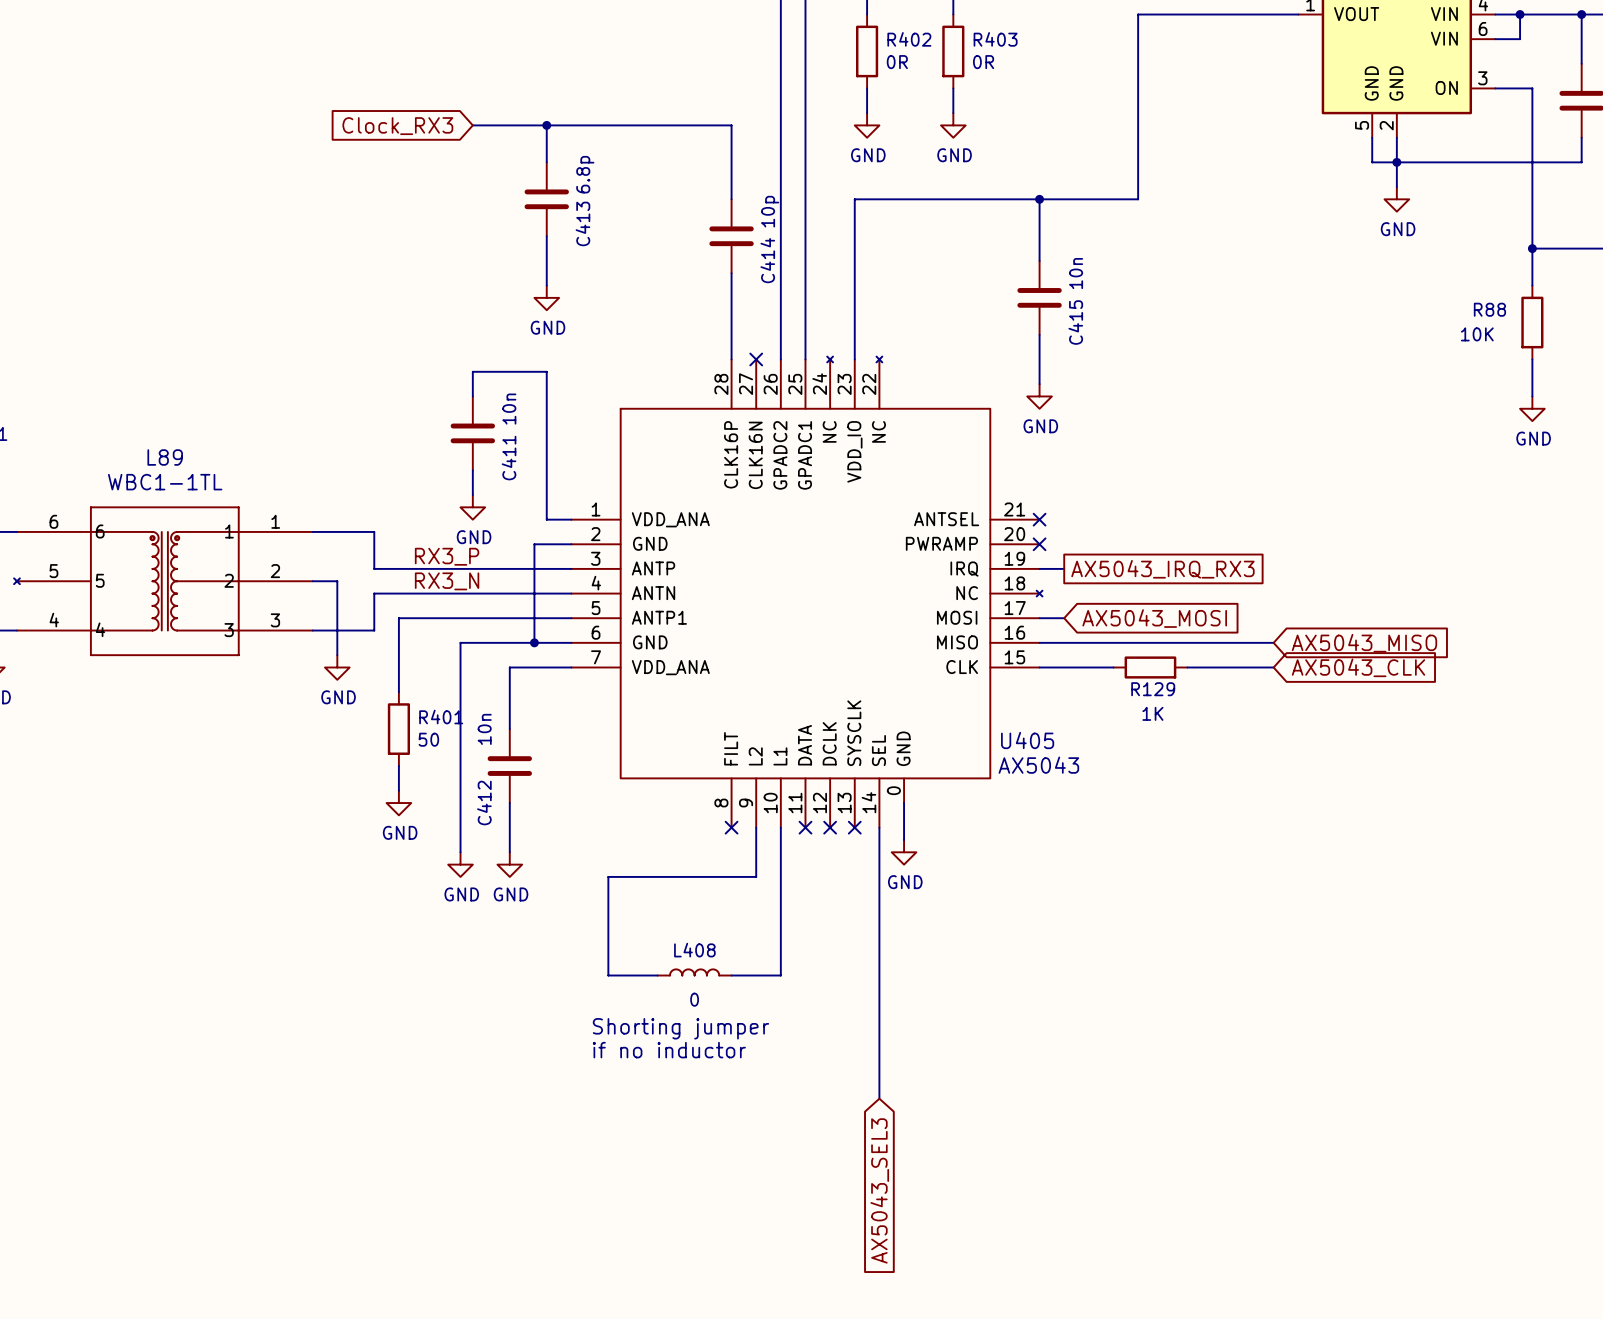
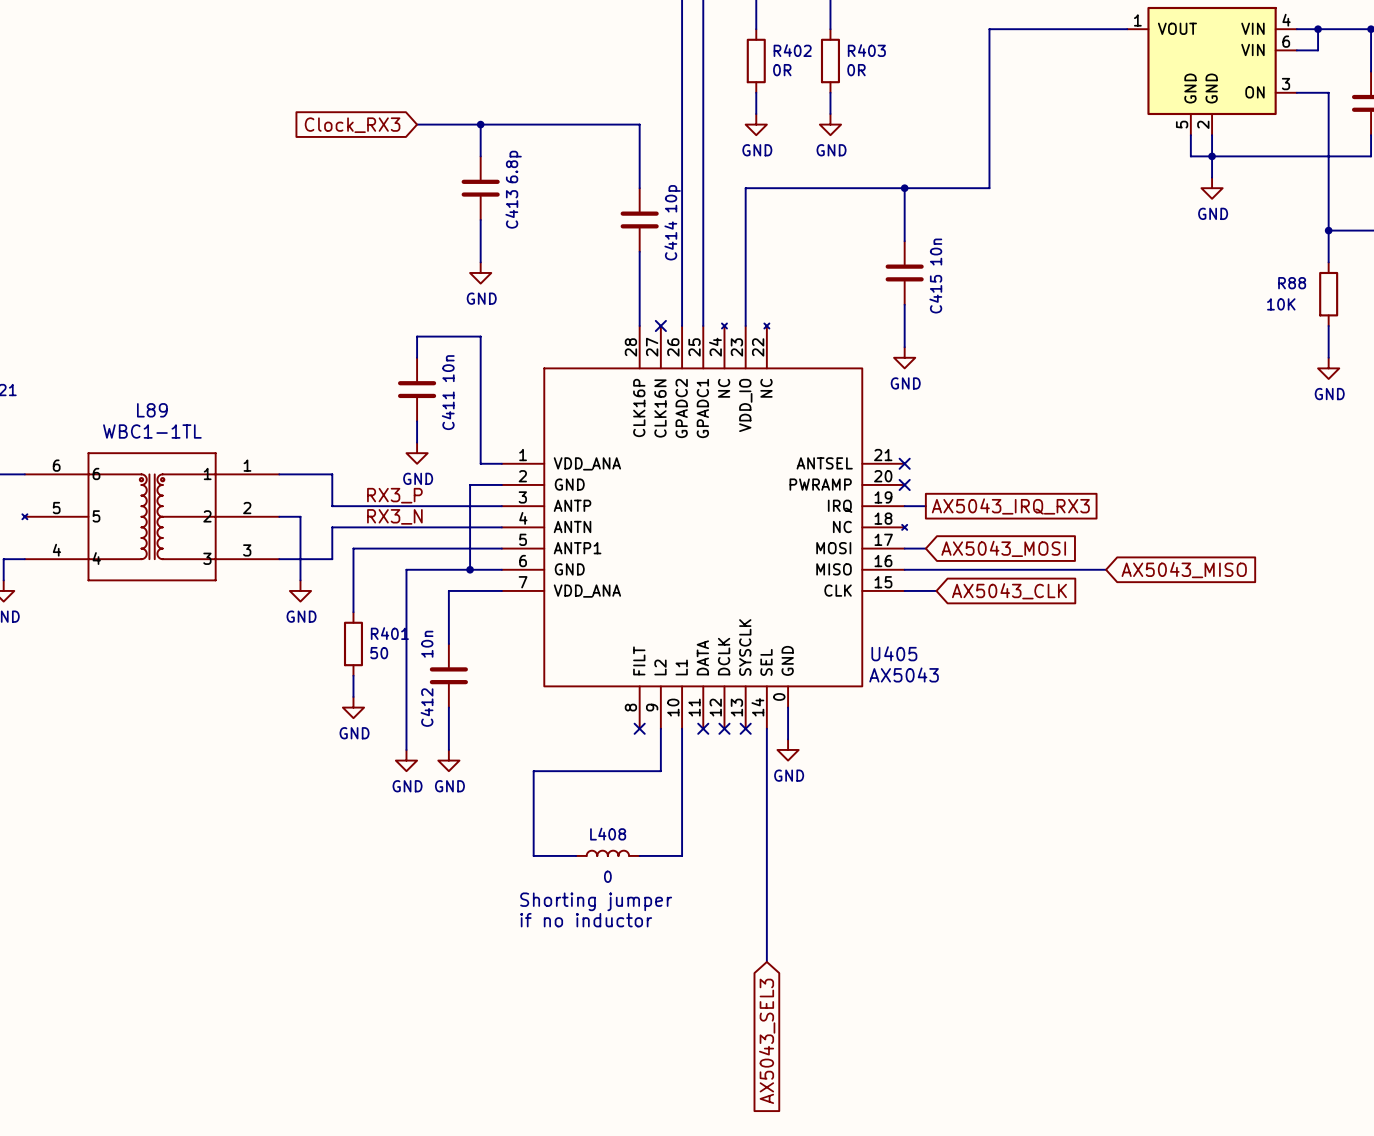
wire: (1076, 667) (1113, 667) -> none
R129: 1K (1150, 667) -> none
wire: (1187, 667) (1273, 667) -> none
global label position: AX5043_CLK (1358, 667) -> AX5043_CLK (1009, 591)

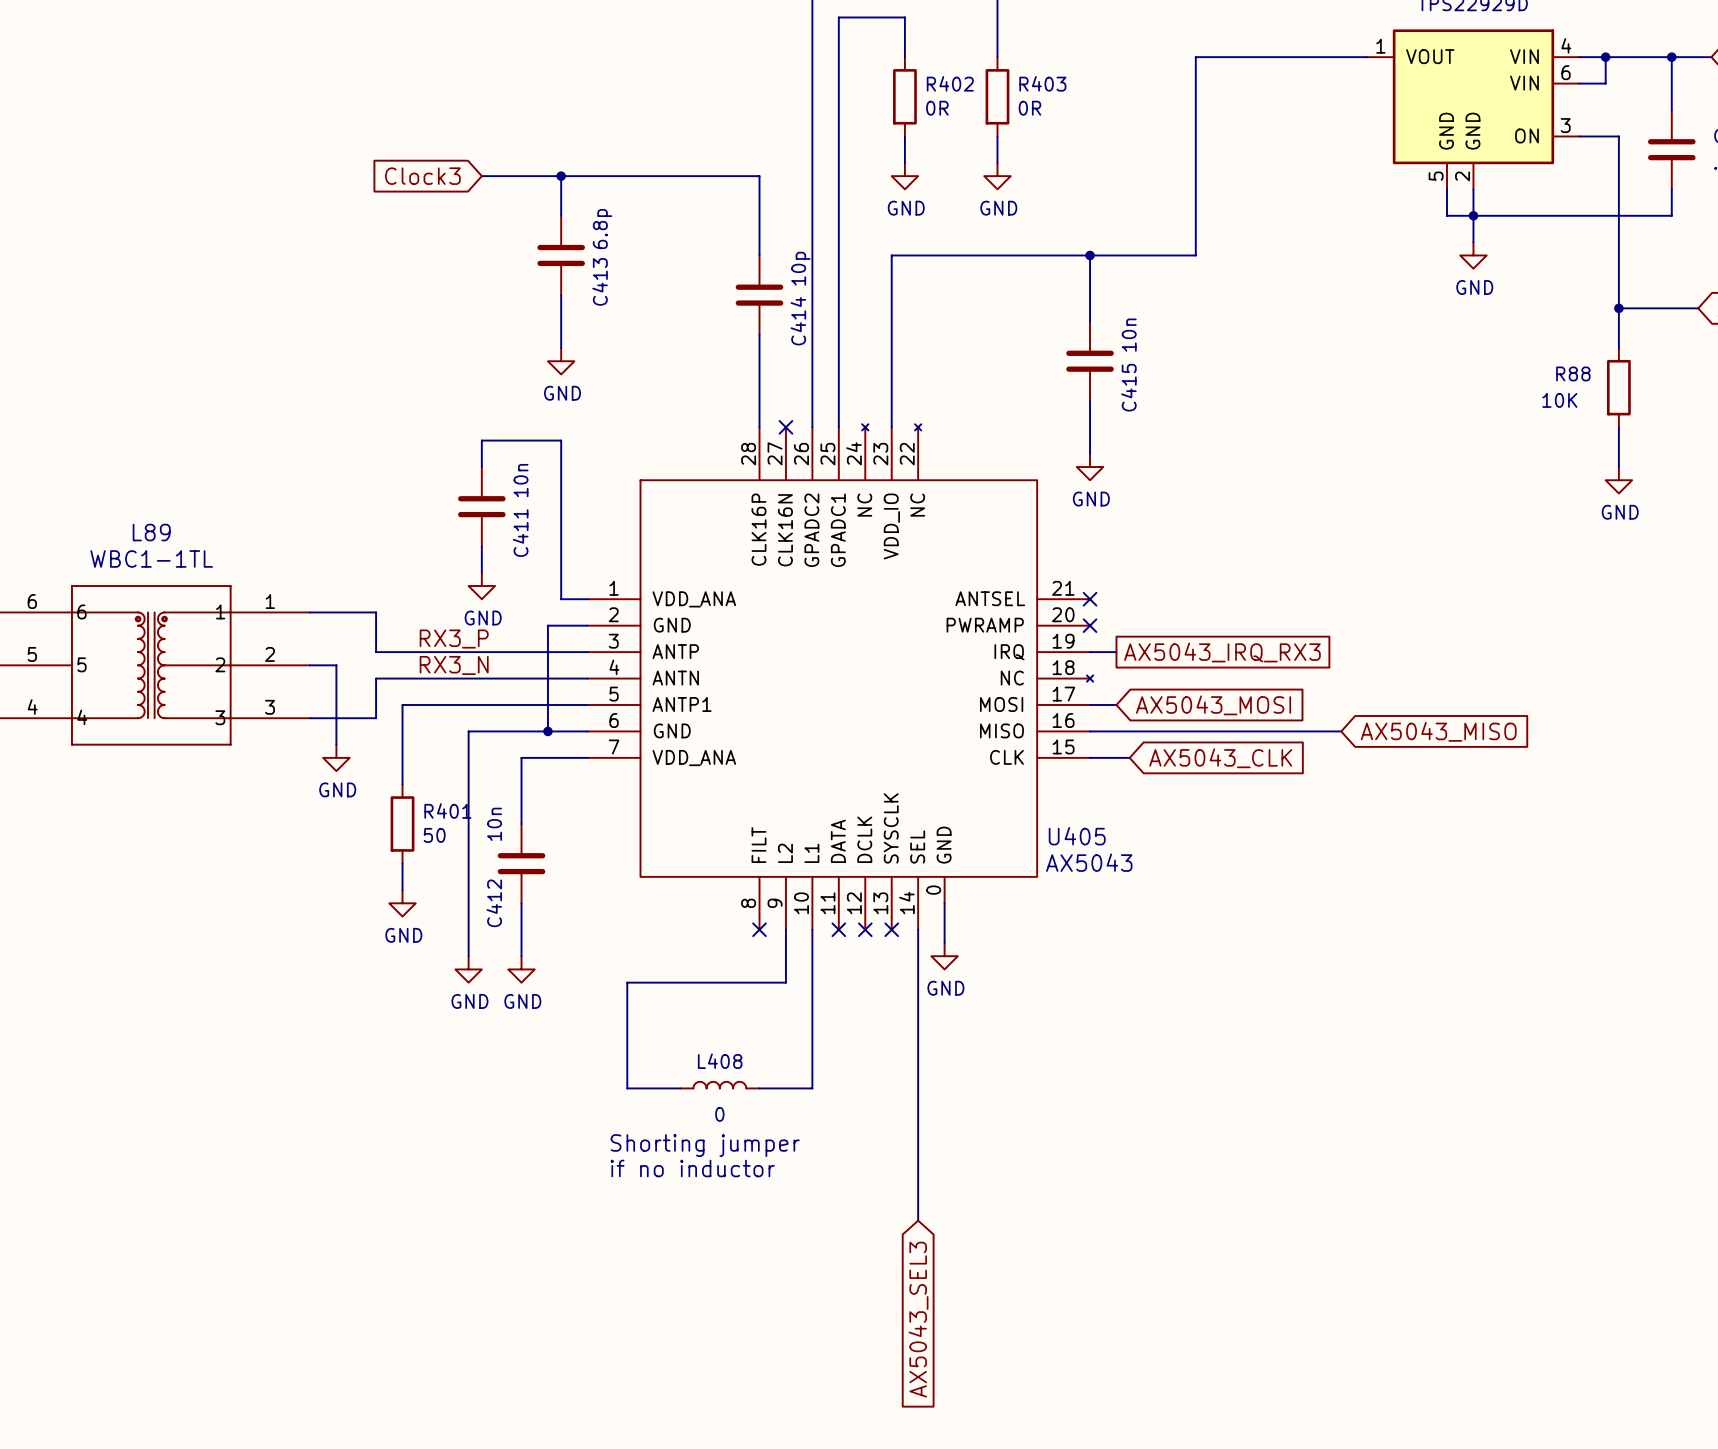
global label: Clock_RX3 (352, 125) -> Clock3 (422, 176)

